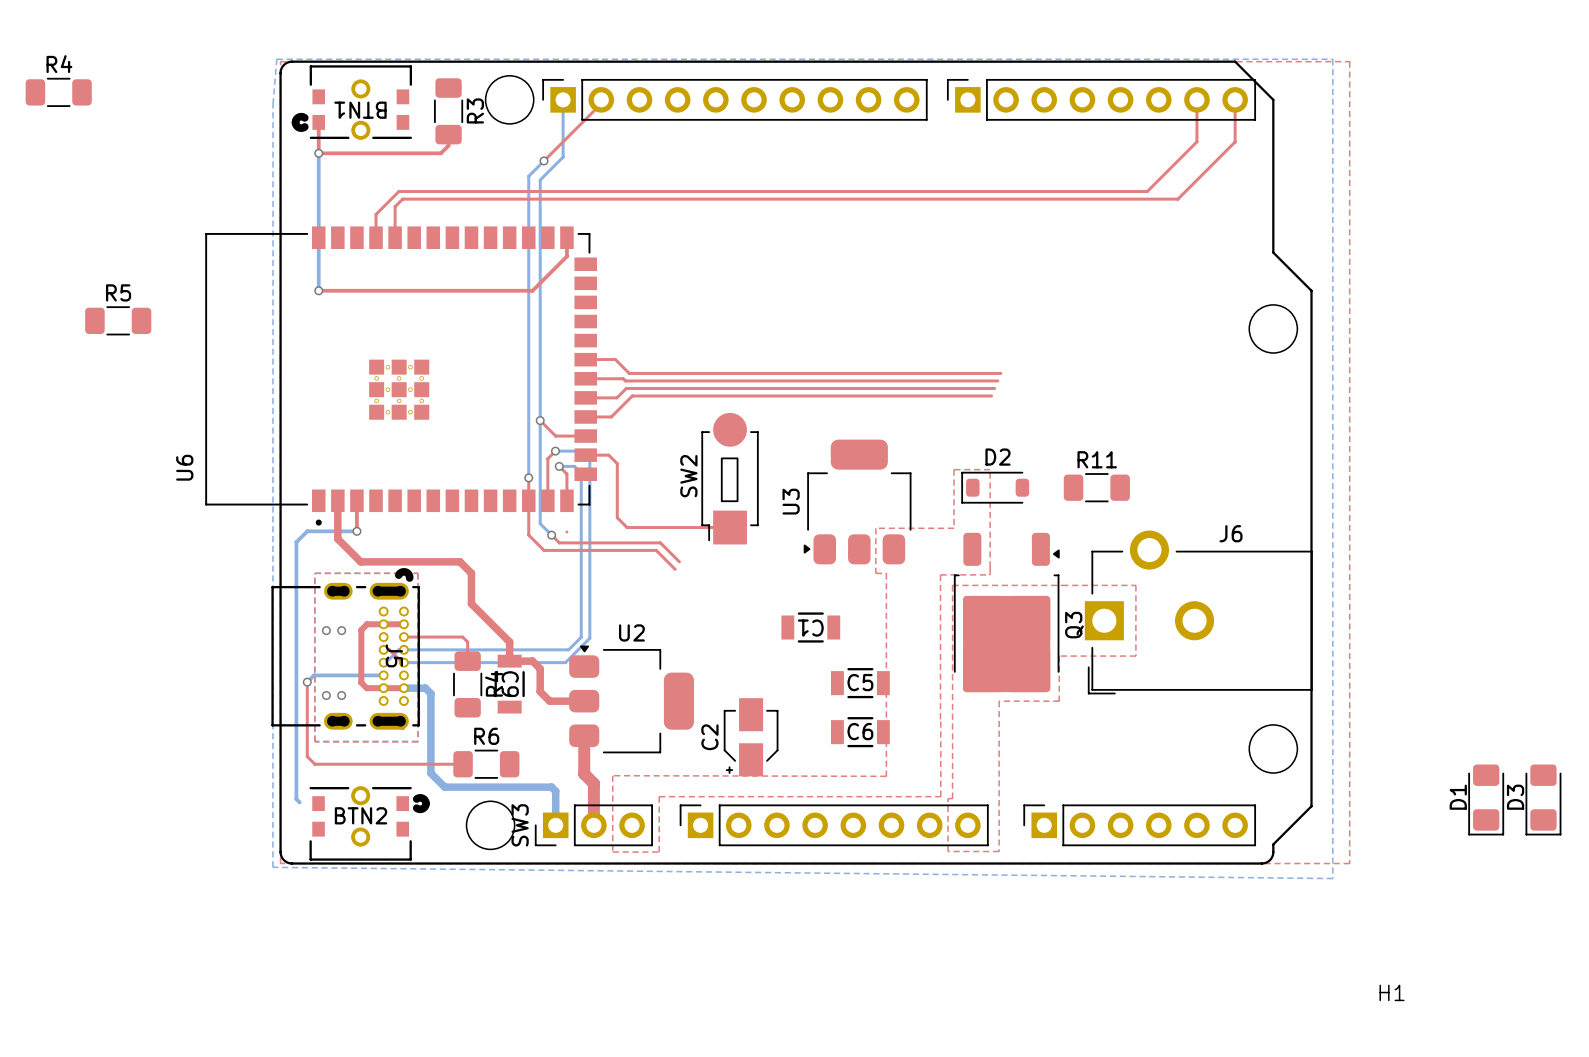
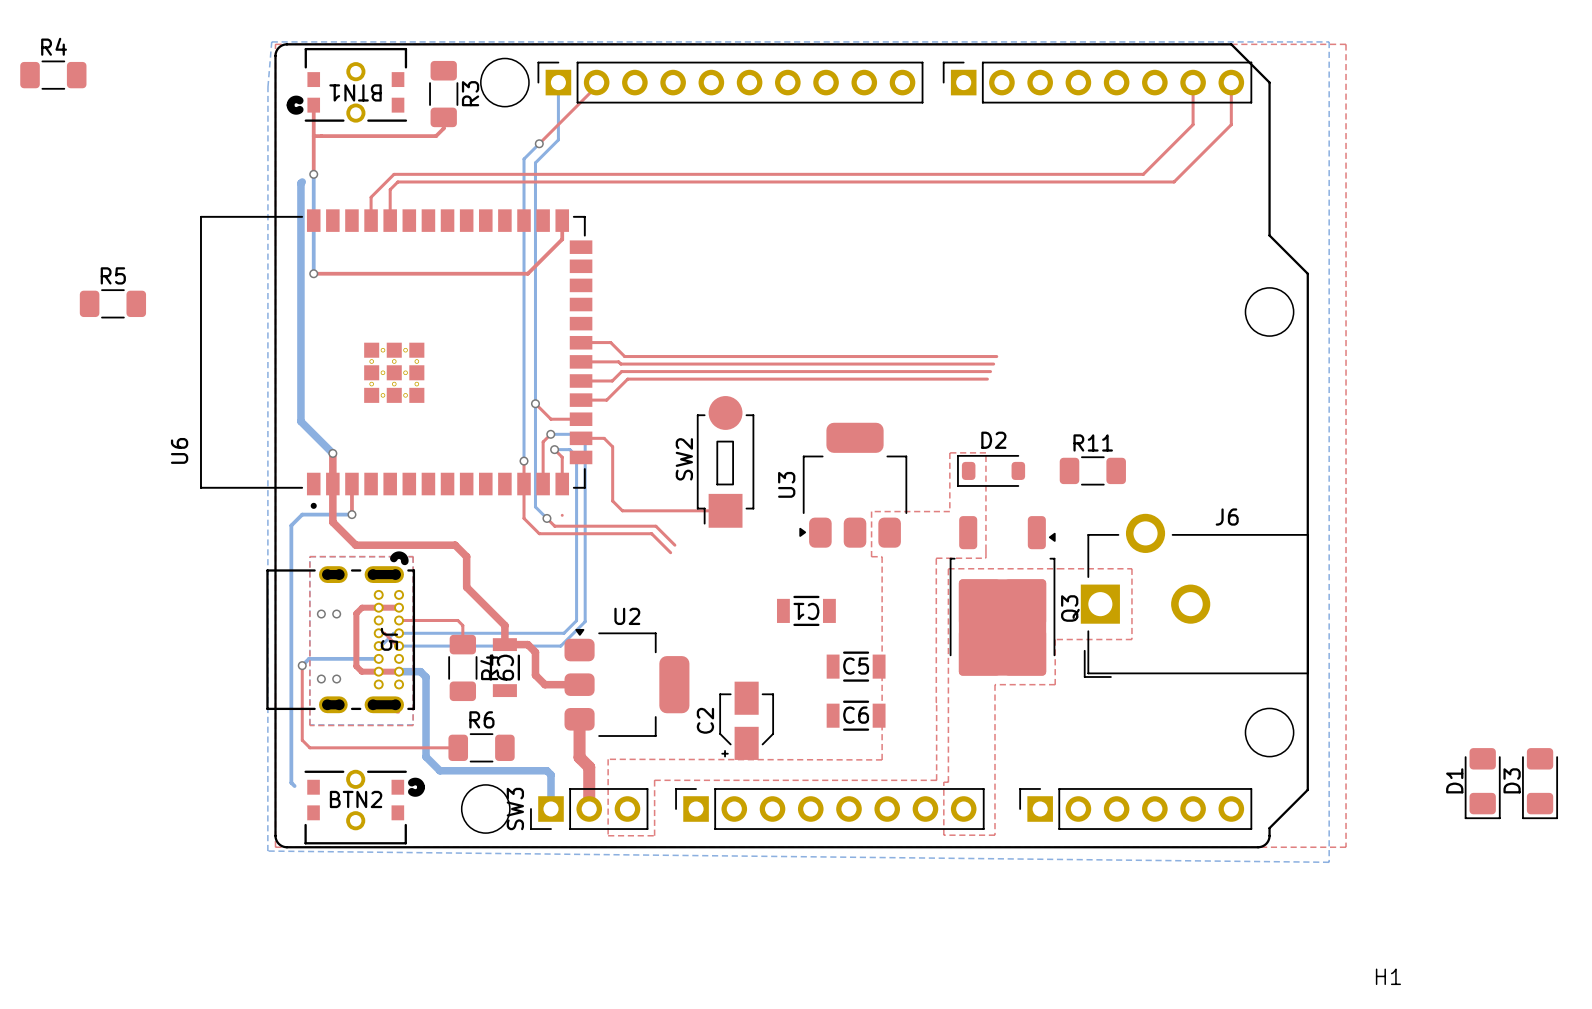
top track: none -> (313, 136) (313, 174)
bottom track: (318, 153) (318, 191) -> none
via position: (318, 153) -> (313, 174)
bottom track: none -> (302, 181) (300, 421) (332, 453)
top track: none -> (332, 453) (332, 484)
via: none -> (332, 453)

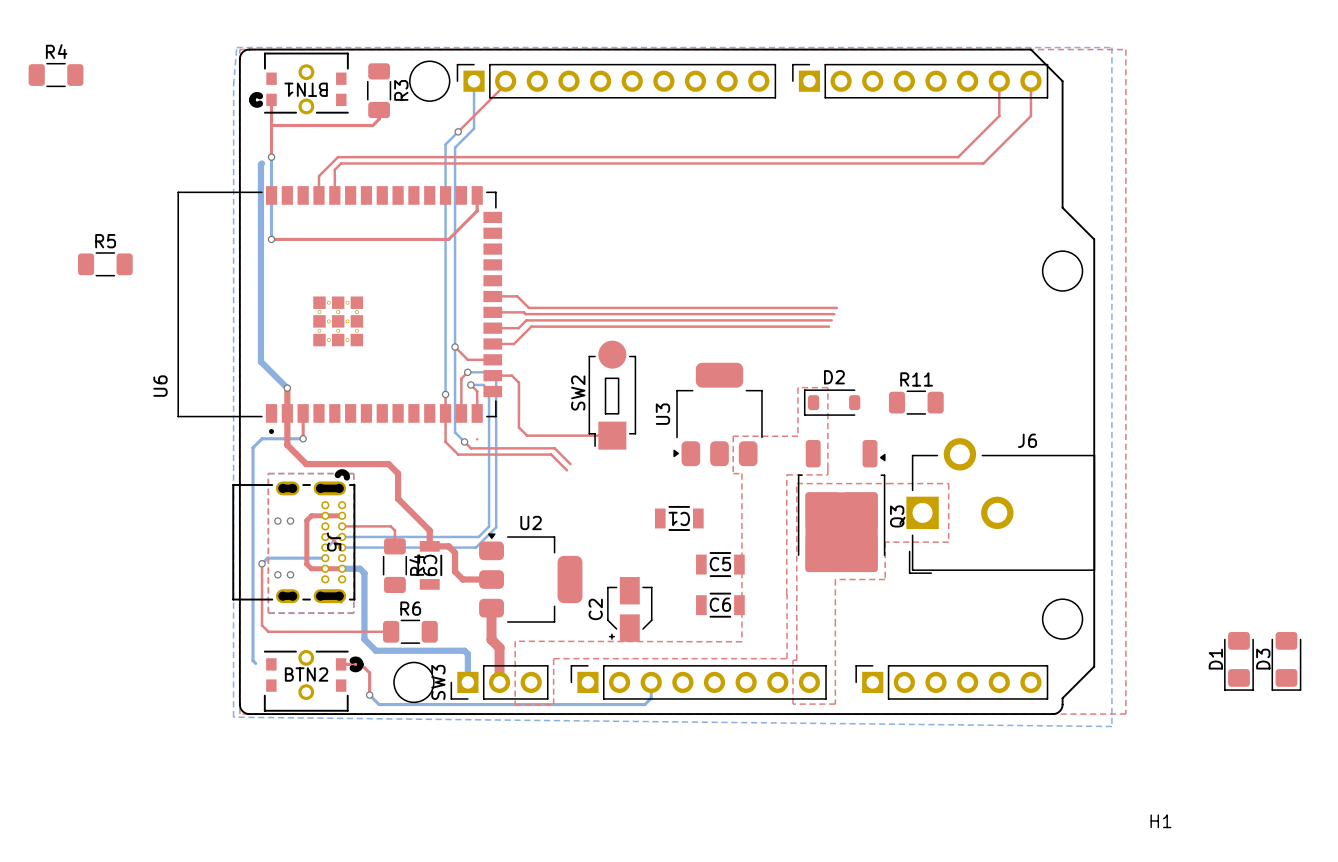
top track: none -> (341, 664) (361, 664) (369, 672) (369, 695)
bottom track: none -> (651, 682) (651, 698) (644, 704) (379, 704) (369, 695)
via: none -> (369, 695)

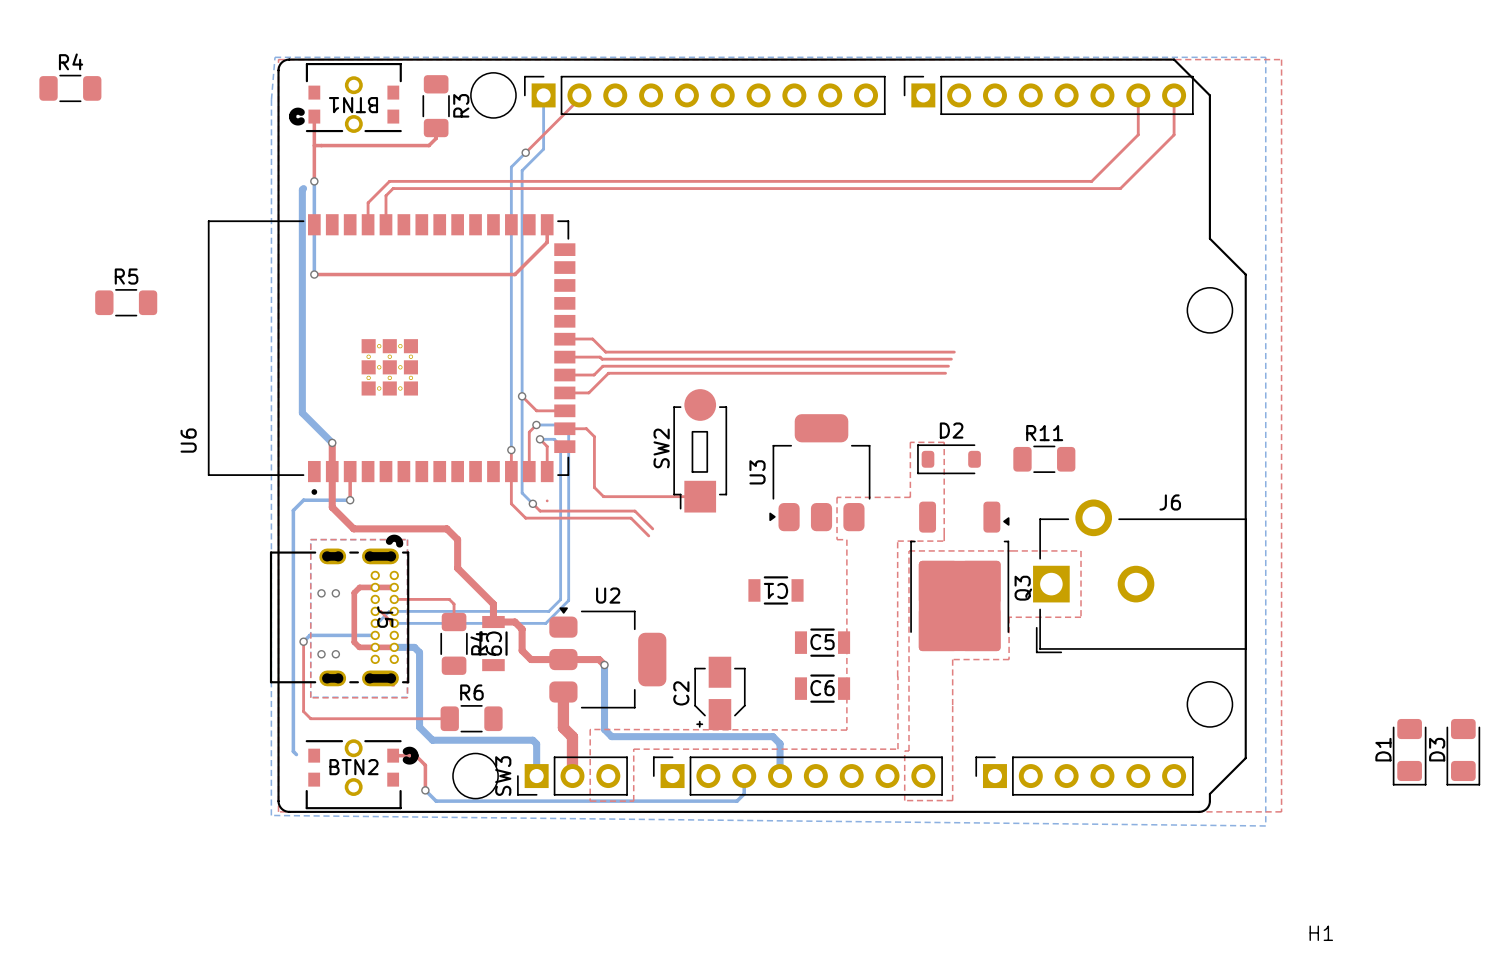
top track: none -> (563, 659) (599, 659) (604, 665)
bottom track: none -> (604, 665) (604, 729) (611, 736) (772, 736) (780, 743) (780, 776)
via: none -> (604, 665)

